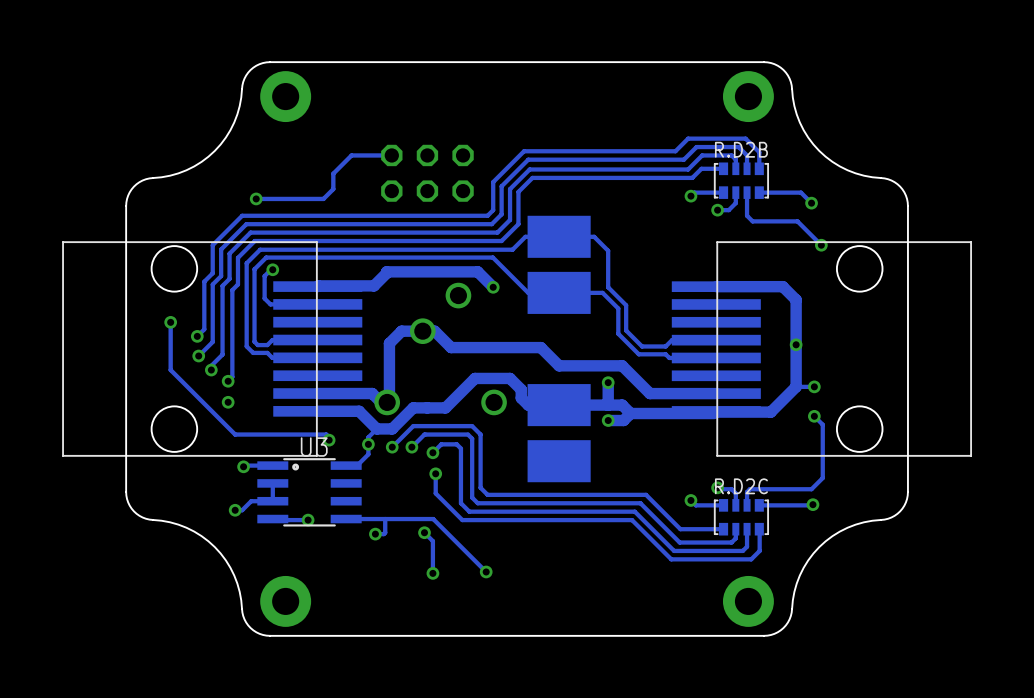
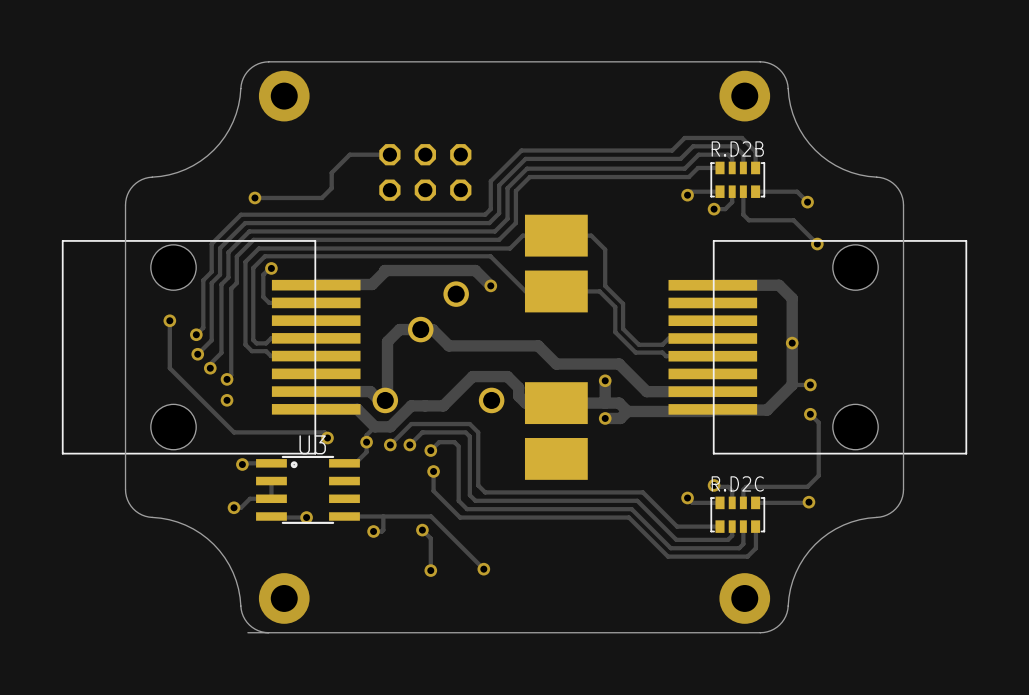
board edge: none -> (268, 632) (247, 632)

